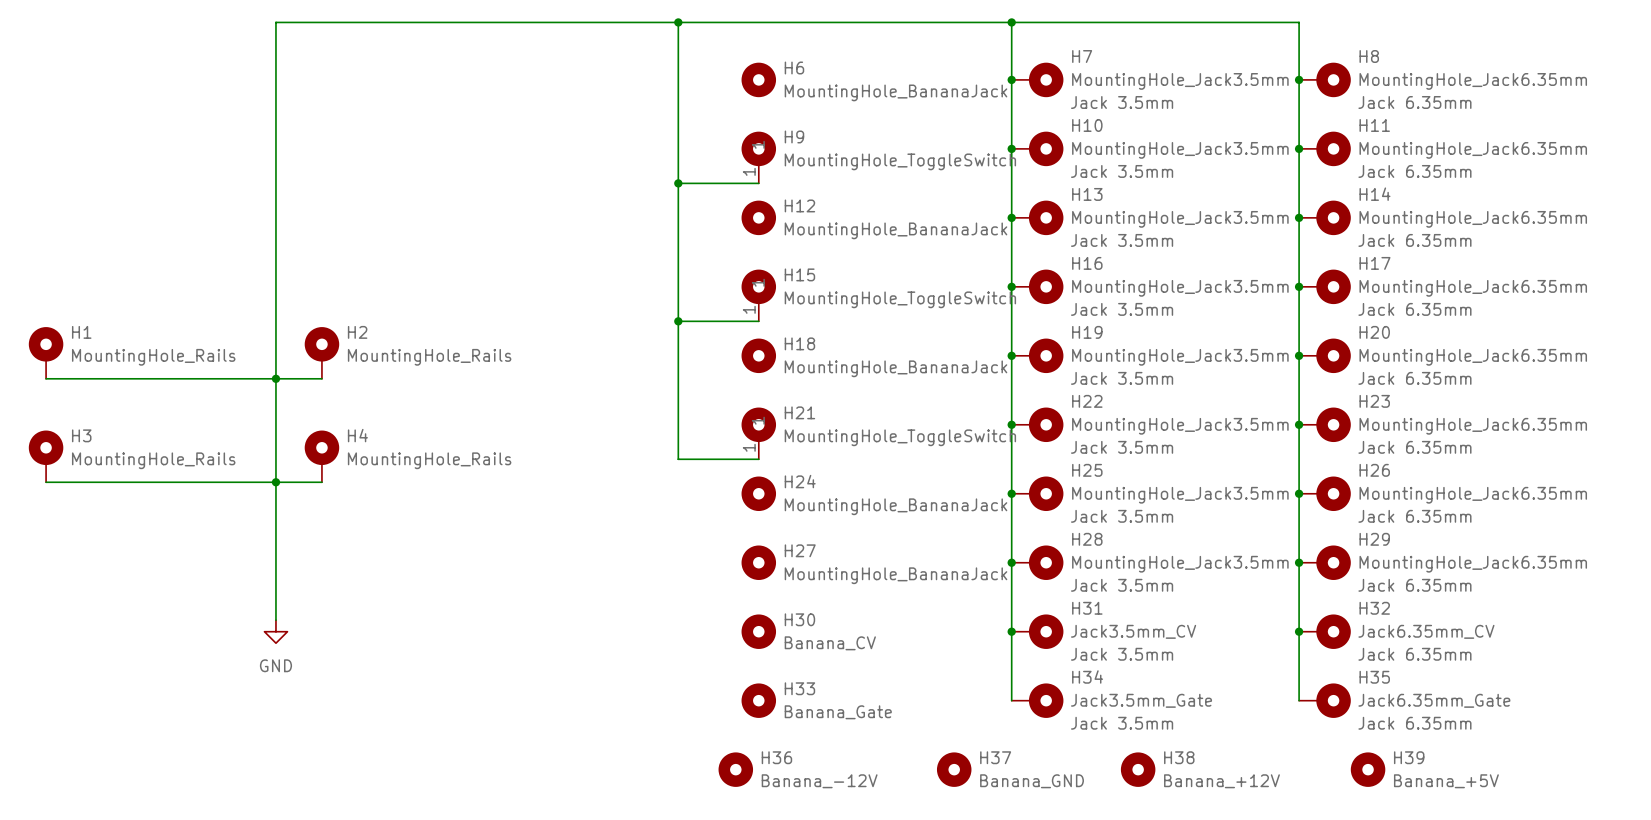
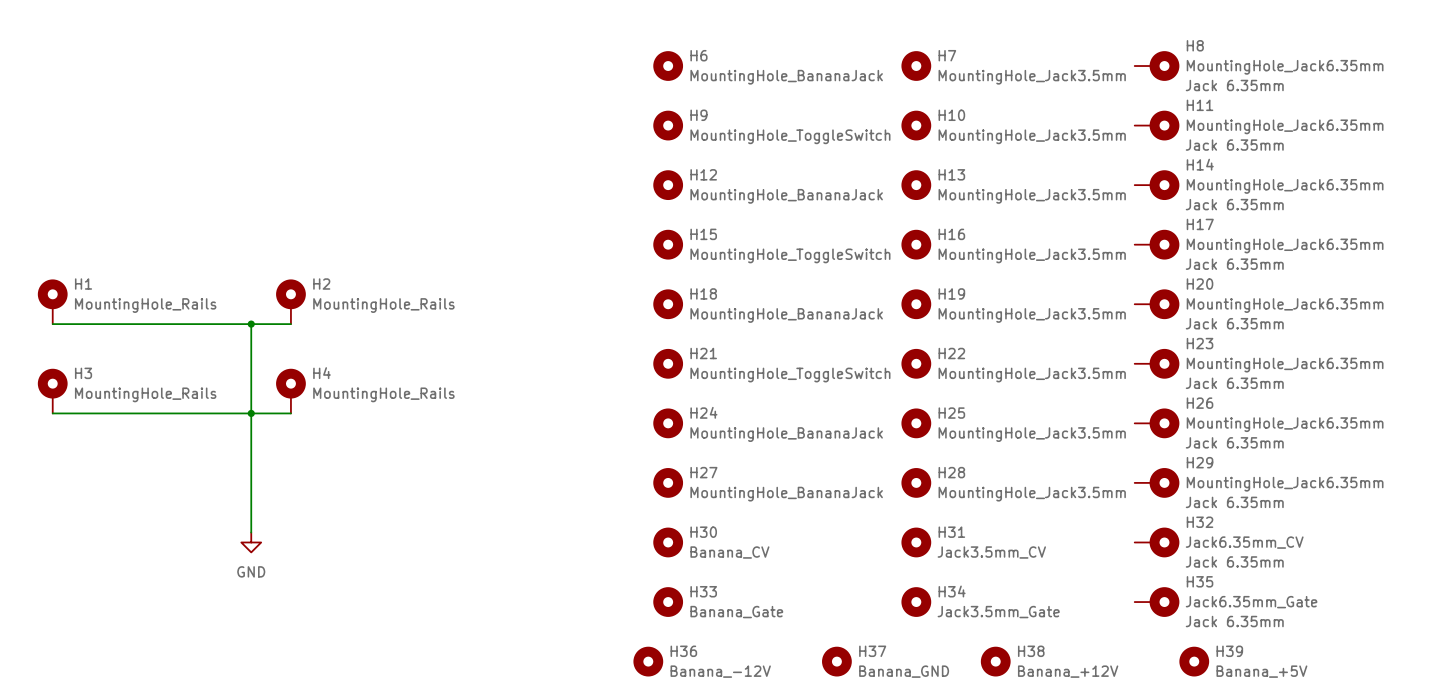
wire: (678, 22) (678, 459) (758, 459) -> none
junction: (678, 22) -> none
wire: (1011, 22) (1011, 700) -> none
junction: (1011, 22) -> none
H7 symbol: [1011, 62, 1064, 98] -> [901, 51, 932, 81]
junction: (1011, 79) -> none
junction: (1299, 79) -> none
H7 text: Jack 3.5mm (1122, 102) -> none
H9 symbol: [741, 131, 777, 184] -> [653, 110, 684, 141]
H10 symbol: [1011, 131, 1064, 167] -> [901, 110, 932, 141]
junction: (1011, 148) -> none
junction: (1299, 148) -> none
H10 text: Jack 3.5mm (1122, 171) -> none
wire: (678, 183) (758, 183) -> none
junction: (678, 183) -> none
H13 symbol: [1011, 200, 1064, 236] -> [901, 170, 932, 201]
junction: (1011, 217) -> none
junction: (1299, 217) -> none
H13 text: Jack 3.5mm (1122, 240) -> none
H15 symbol: [741, 269, 777, 322] -> [653, 229, 684, 260]
H16 symbol: [1011, 269, 1064, 305] -> [901, 229, 932, 260]
junction: (1011, 286) -> none
junction: (1299, 286) -> none
H16 text: Jack 3.5mm (1122, 309) -> none
wire: (678, 321) (758, 321) -> none
junction: (678, 321) -> none
H19 symbol: [1011, 338, 1064, 374] -> [901, 289, 932, 320]
junction: (1011, 355) -> none
junction: (1299, 355) -> none
wire: (275, 378) (275, 22) (1299, 22) (1299, 700) -> none
H19 text: Jack 3.5mm (1122, 378) -> none
H21 symbol: [741, 407, 777, 460] -> [653, 348, 684, 379]
H22 symbol: [1011, 407, 1064, 443] -> [901, 348, 932, 379]
junction: (1011, 424) -> none
junction: (1299, 424) -> none
H22 text: Jack 3.5mm (1122, 447) -> none
H25 symbol: [1011, 476, 1064, 512] -> [901, 408, 932, 439]
junction: (1011, 493) -> none
junction: (1299, 493) -> none
H25 text: Jack 3.5mm (1122, 516) -> none
H28 symbol: [1011, 545, 1064, 580] -> [901, 468, 932, 498]
junction: (1011, 562) -> none
junction: (1299, 562) -> none
H28 text: Jack 3.5mm (1122, 585) -> none
H31 symbol: [1011, 614, 1064, 649] -> [901, 527, 932, 558]
junction: (1011, 631) -> none
junction: (1299, 631) -> none
H31 text: Jack 3.5mm (1122, 654) -> none
H34 symbol: [1011, 683, 1064, 718] -> [901, 587, 932, 617]
H34 text: Jack 3.5mm (1122, 723) -> none

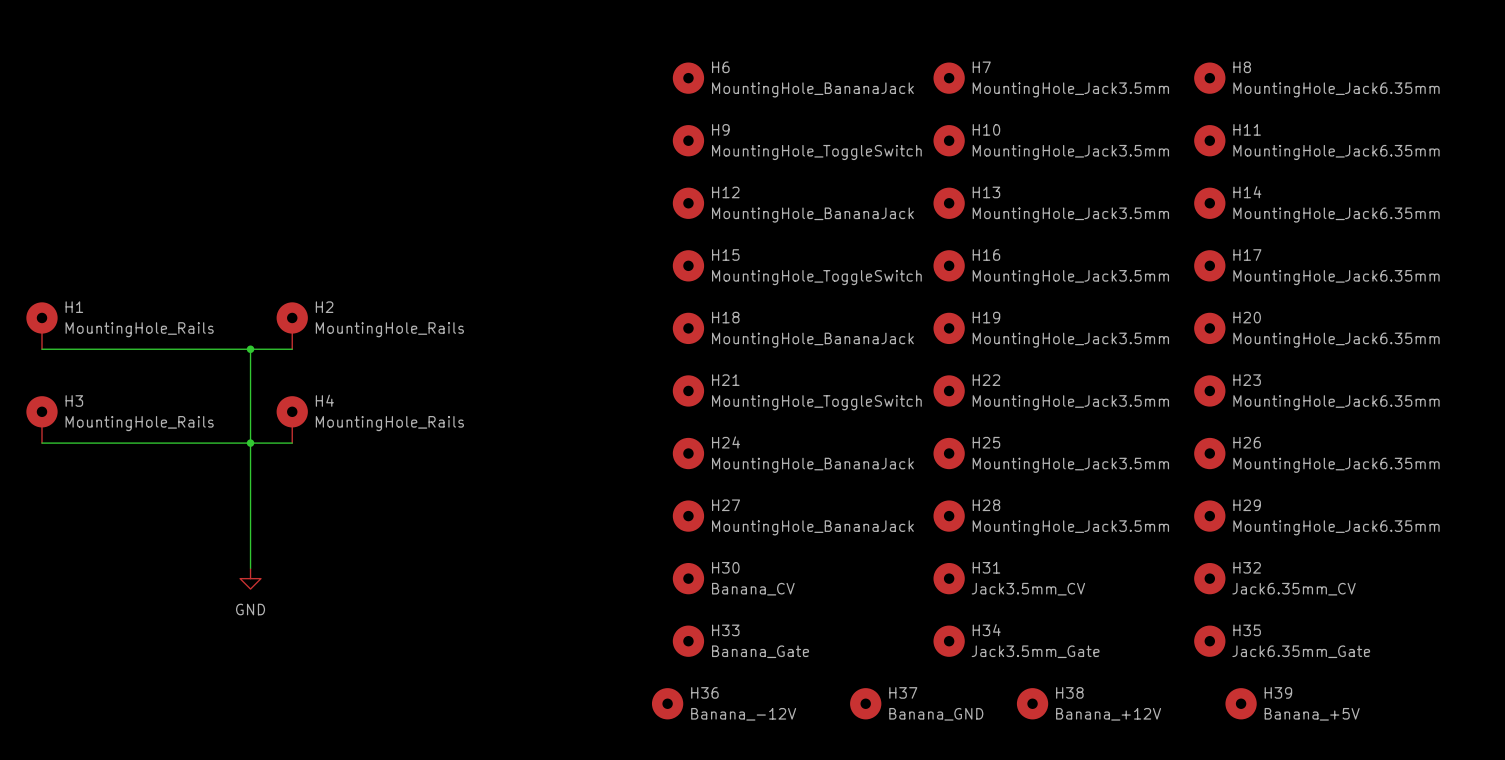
H8 symbol: [1134, 51, 1180, 81] -> [1194, 62, 1226, 94]
H8 text: Jack 6.35mm (1234, 85) -> none
H11 symbol: [1134, 110, 1180, 141] -> [1194, 125, 1226, 157]
H11 text: Jack 6.35mm (1234, 145) -> none
H14 symbol: [1134, 170, 1180, 201] -> [1194, 187, 1226, 219]
H14 text: Jack 6.35mm (1234, 204) -> none
H17 symbol: [1134, 229, 1180, 260] -> [1194, 250, 1226, 282]
H17 text: Jack 6.35mm (1234, 264) -> none
H20 symbol: [1134, 289, 1180, 320] -> [1194, 312, 1226, 345]
H20 text: Jack 6.35mm (1234, 323) -> none
H23 symbol: [1134, 348, 1180, 379] -> [1194, 375, 1226, 407]
H23 text: Jack 6.35mm (1234, 383) -> none
H26 symbol: [1134, 408, 1180, 439] -> [1194, 437, 1226, 470]
H26 text: Jack 6.35mm (1234, 442) -> none
H29 symbol: [1134, 468, 1180, 498] -> [1194, 500, 1226, 532]
H29 text: Jack 6.35mm (1234, 502) -> none
H32 symbol: [1134, 527, 1180, 558] -> [1194, 563, 1226, 595]
H32 text: Jack 6.35mm (1234, 561) -> none
H35 symbol: [1134, 587, 1180, 617] -> [1194, 625, 1226, 657]
H35 text: Jack 6.35mm (1234, 621) -> none

